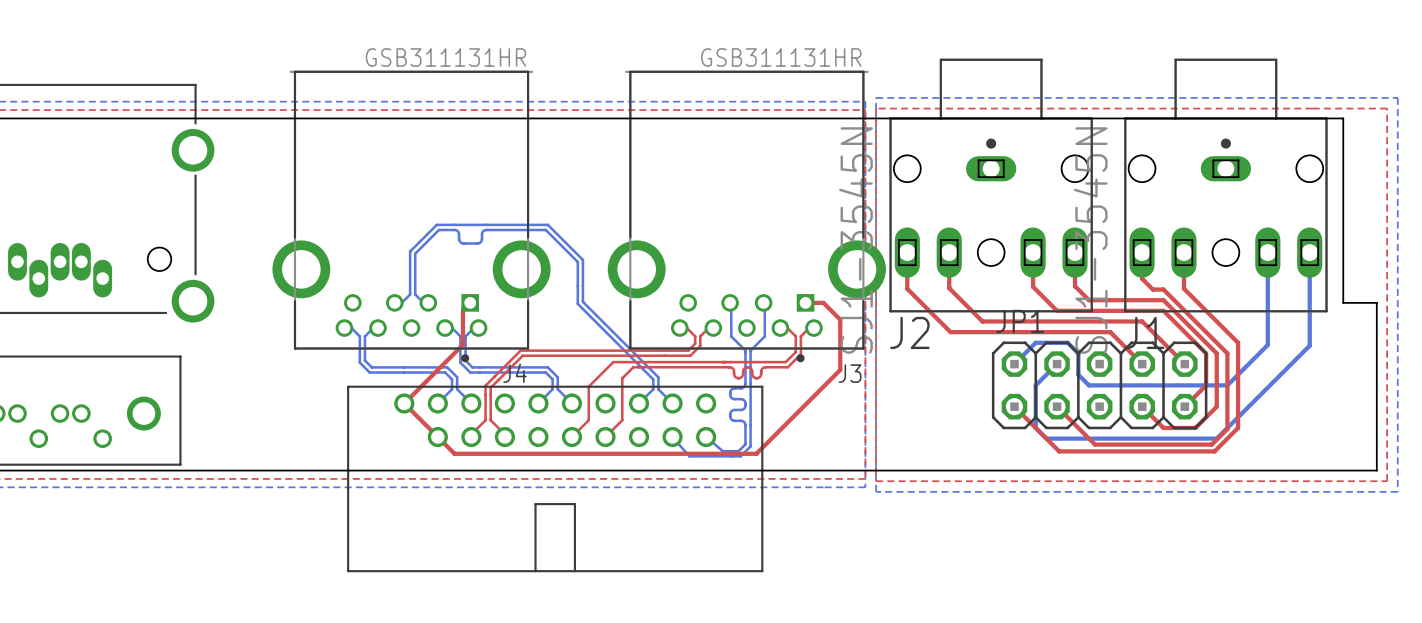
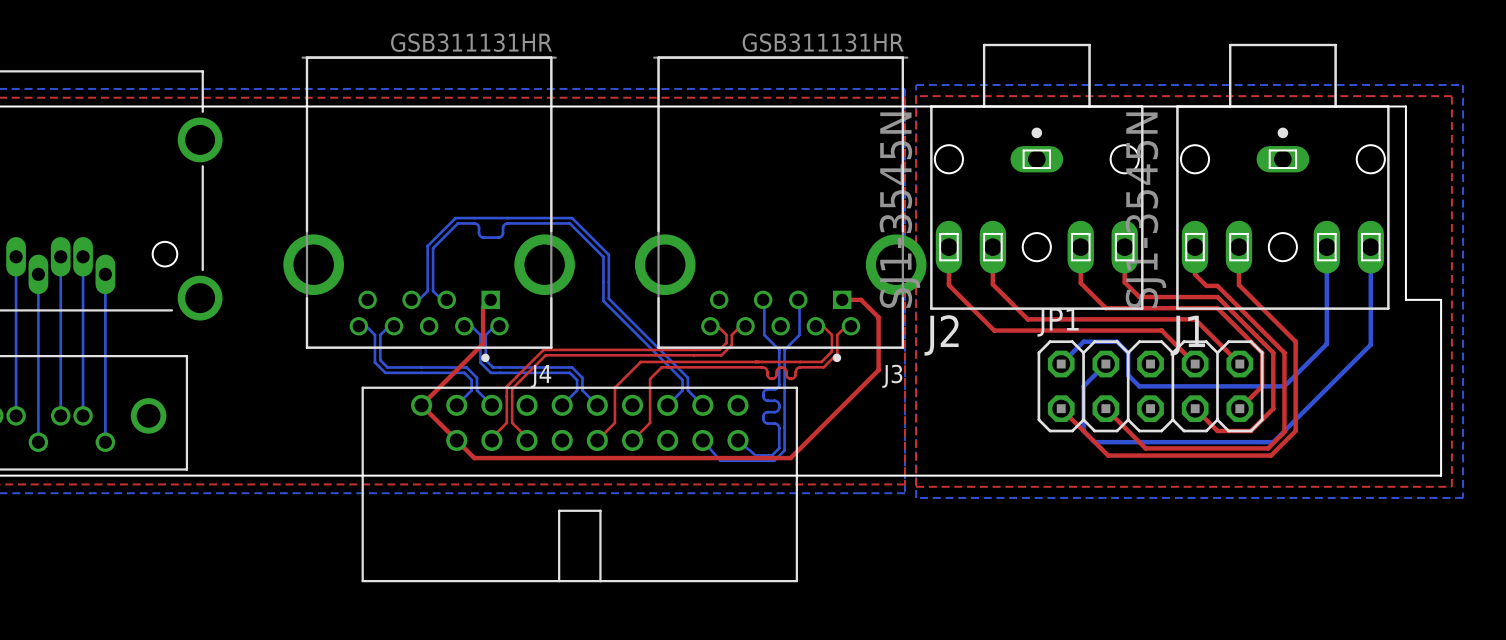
bottom track: none -> (16, 256) (16, 415)
bottom track: none -> (60, 256) (60, 415)
bottom track: none -> (83, 256) (83, 415)
bottom track: none -> (38, 274) (38, 442)
bottom track: none -> (105, 274) (105, 442)

